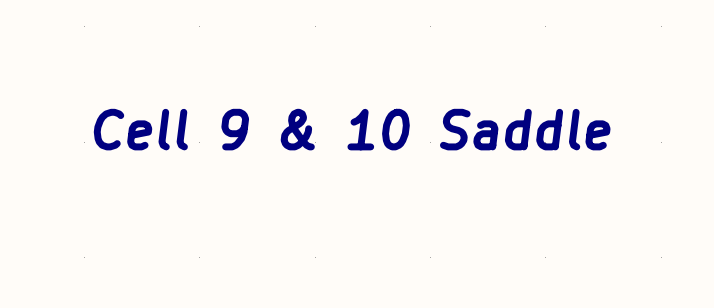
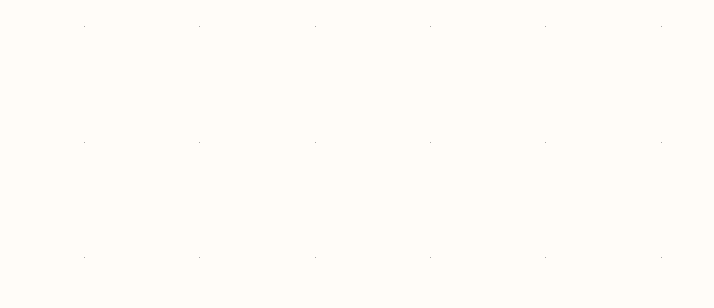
text: Cell 9 & 10 Saddle (352, 129) -> none

